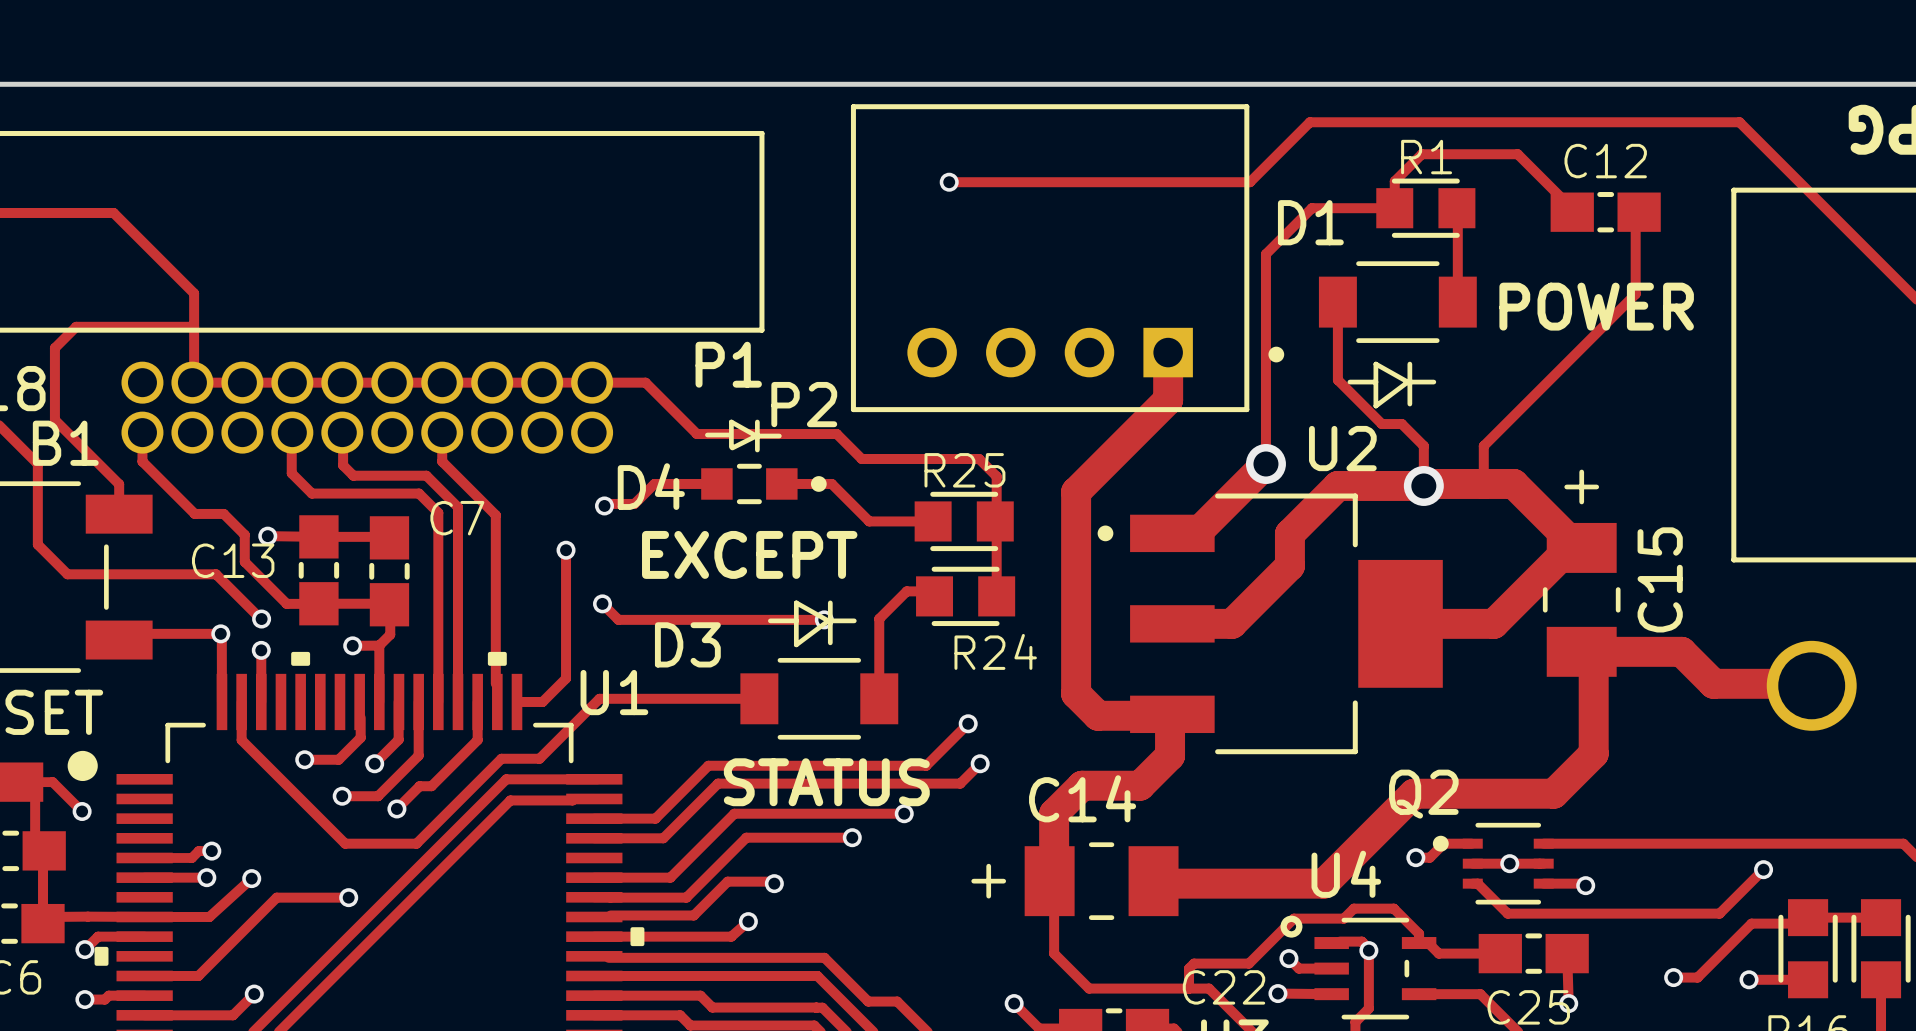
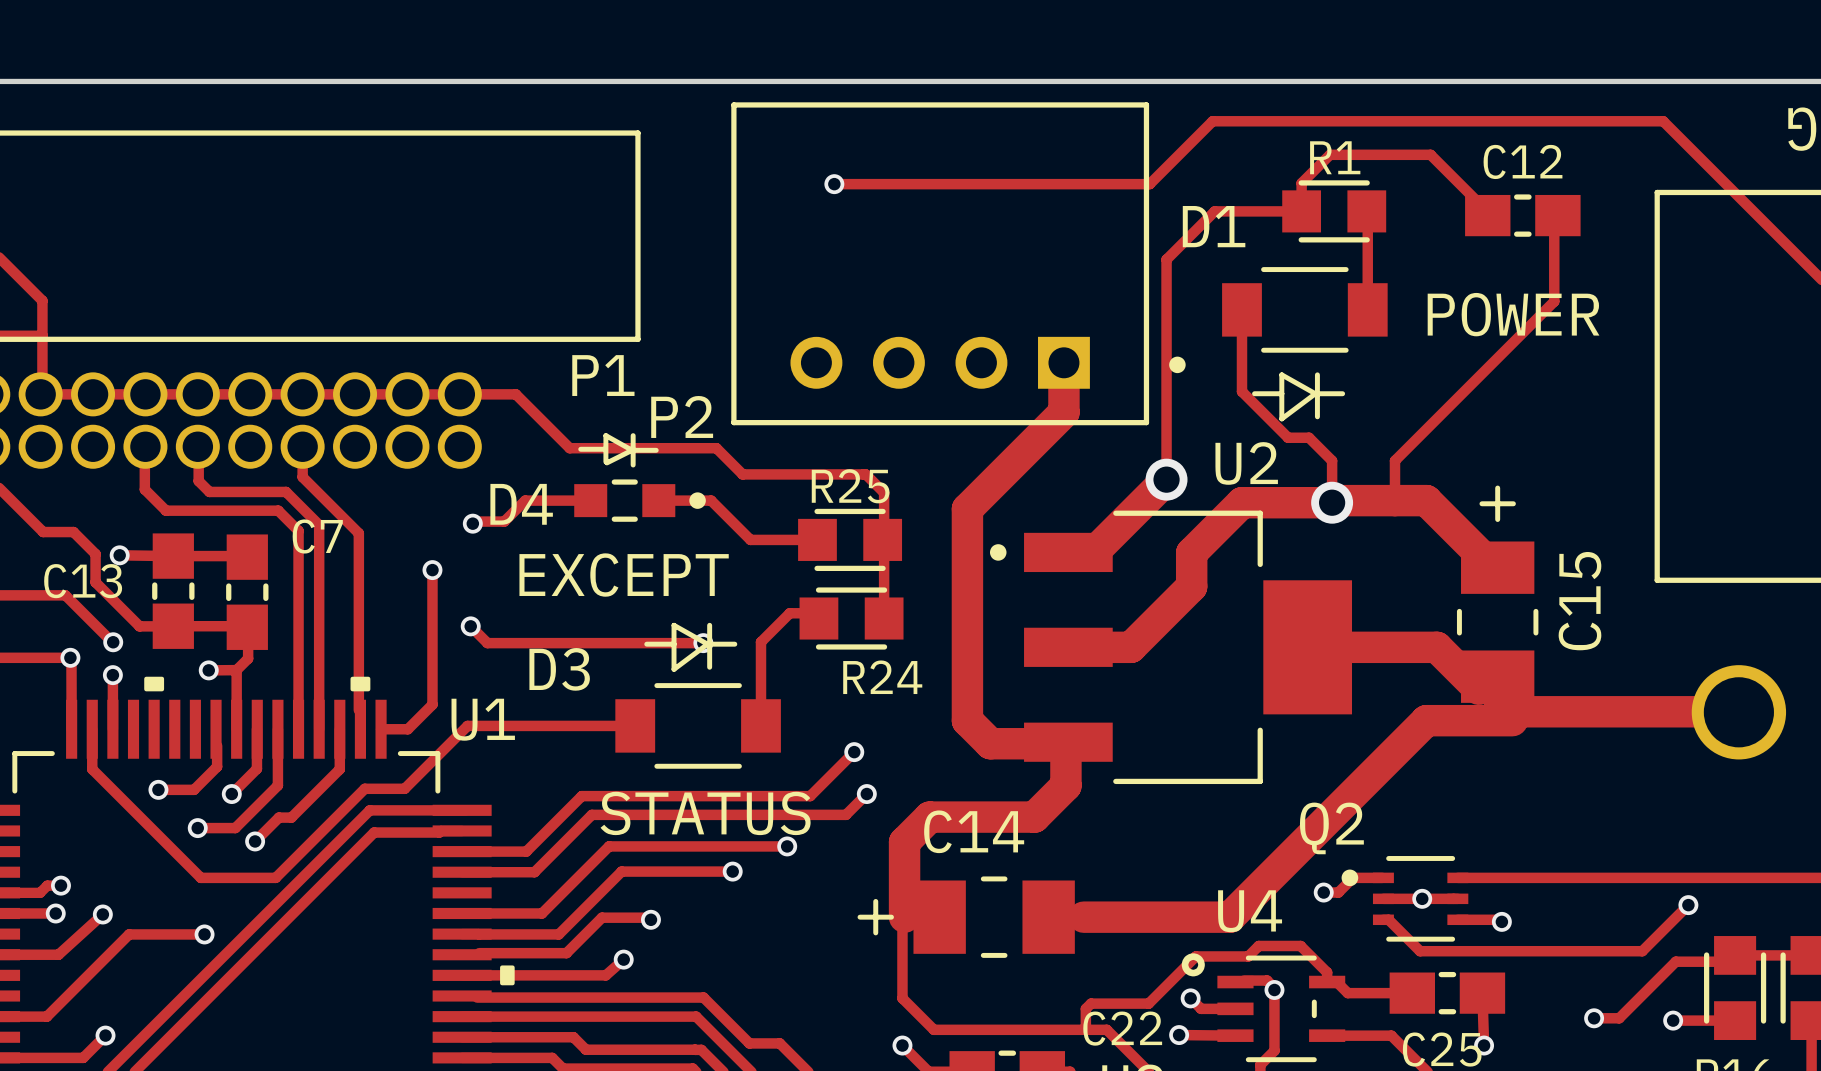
track: (1563, 553) (1493, 623) -> (1478, 689) (1436, 647) (1405, 647)
track: (1581, 651) (1681, 651) (1713, 683) (1803, 683) -> none
track: (1593, 653) (1593, 753) (1553, 793) (1413, 793) -> (1512, 720) (1426, 720) (1321, 825)
track: none -> (1497, 711) (1745, 711)
track: (1082, 785) (1054, 813) (1054, 873) -> (973, 817) (929, 817) (904, 842) (904, 917)
track: (1326, 881) (1323, 883) (1154, 883) -> (1229, 917) (1083, 917)
track: (1054, 883) (1054, 953) (1089, 988) -> (902, 925) (902, 998) (933, 1029) (981, 1029)

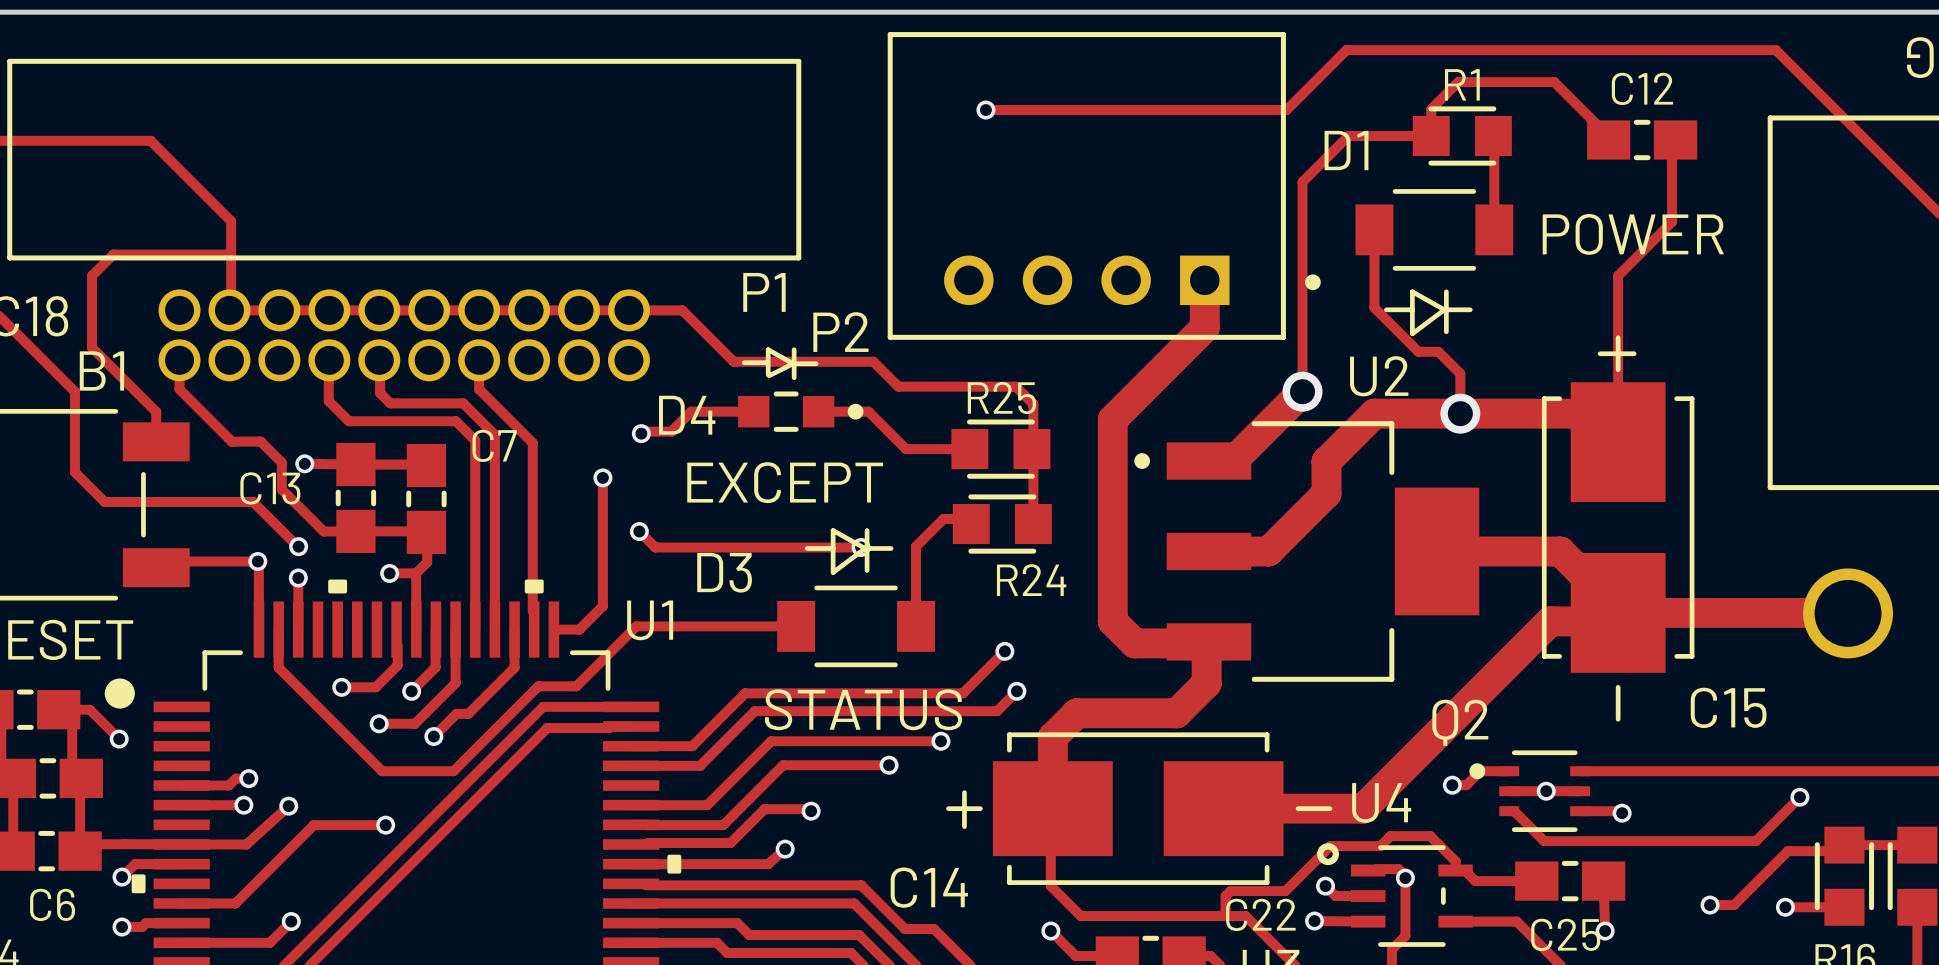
track: (1497, 358) (1394, 460) (1394, 500) -> (1618, 275) (1618, 442)
C15 footprint: [1456, 485, 1539, 703] -> [1541, 335, 1695, 722]
track: (1332, 502) (1334, 500) (1426, 500) (1493, 567) -> (1460, 413) (1640, 413)
C15 name position: C15 (1579, 601) -> C15 (1728, 707)
C14 name position: C14 (974, 831) -> C14 (929, 887)
C14 footprint: [857, 876, 1075, 958] -> [946, 732, 1333, 885]

